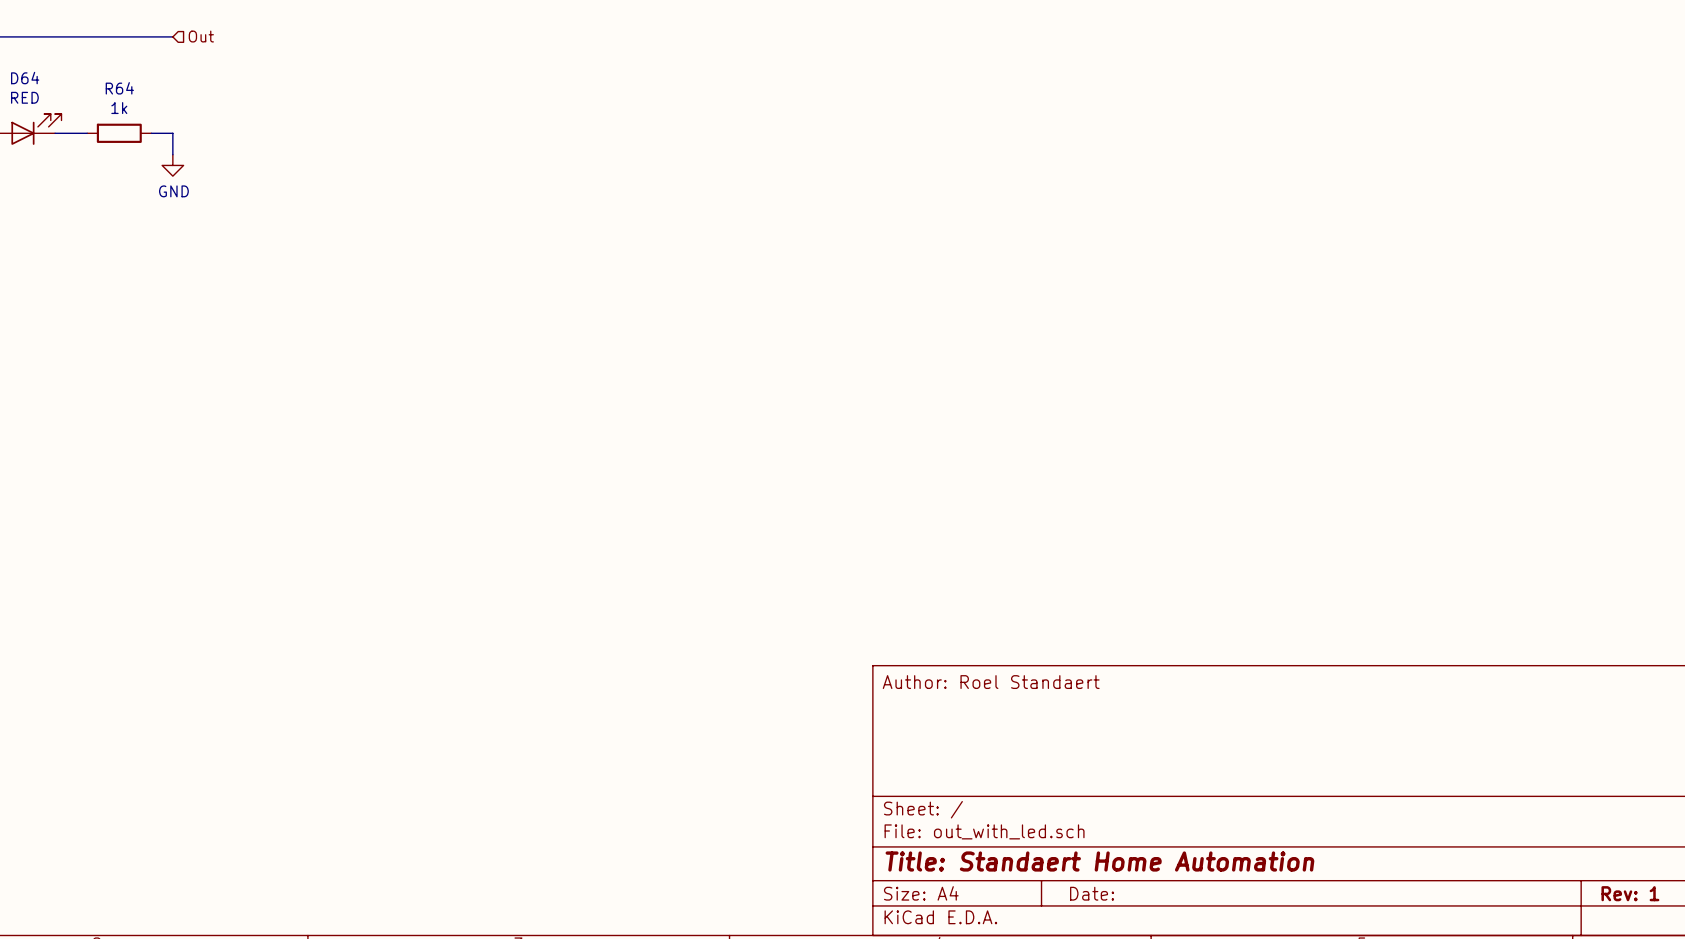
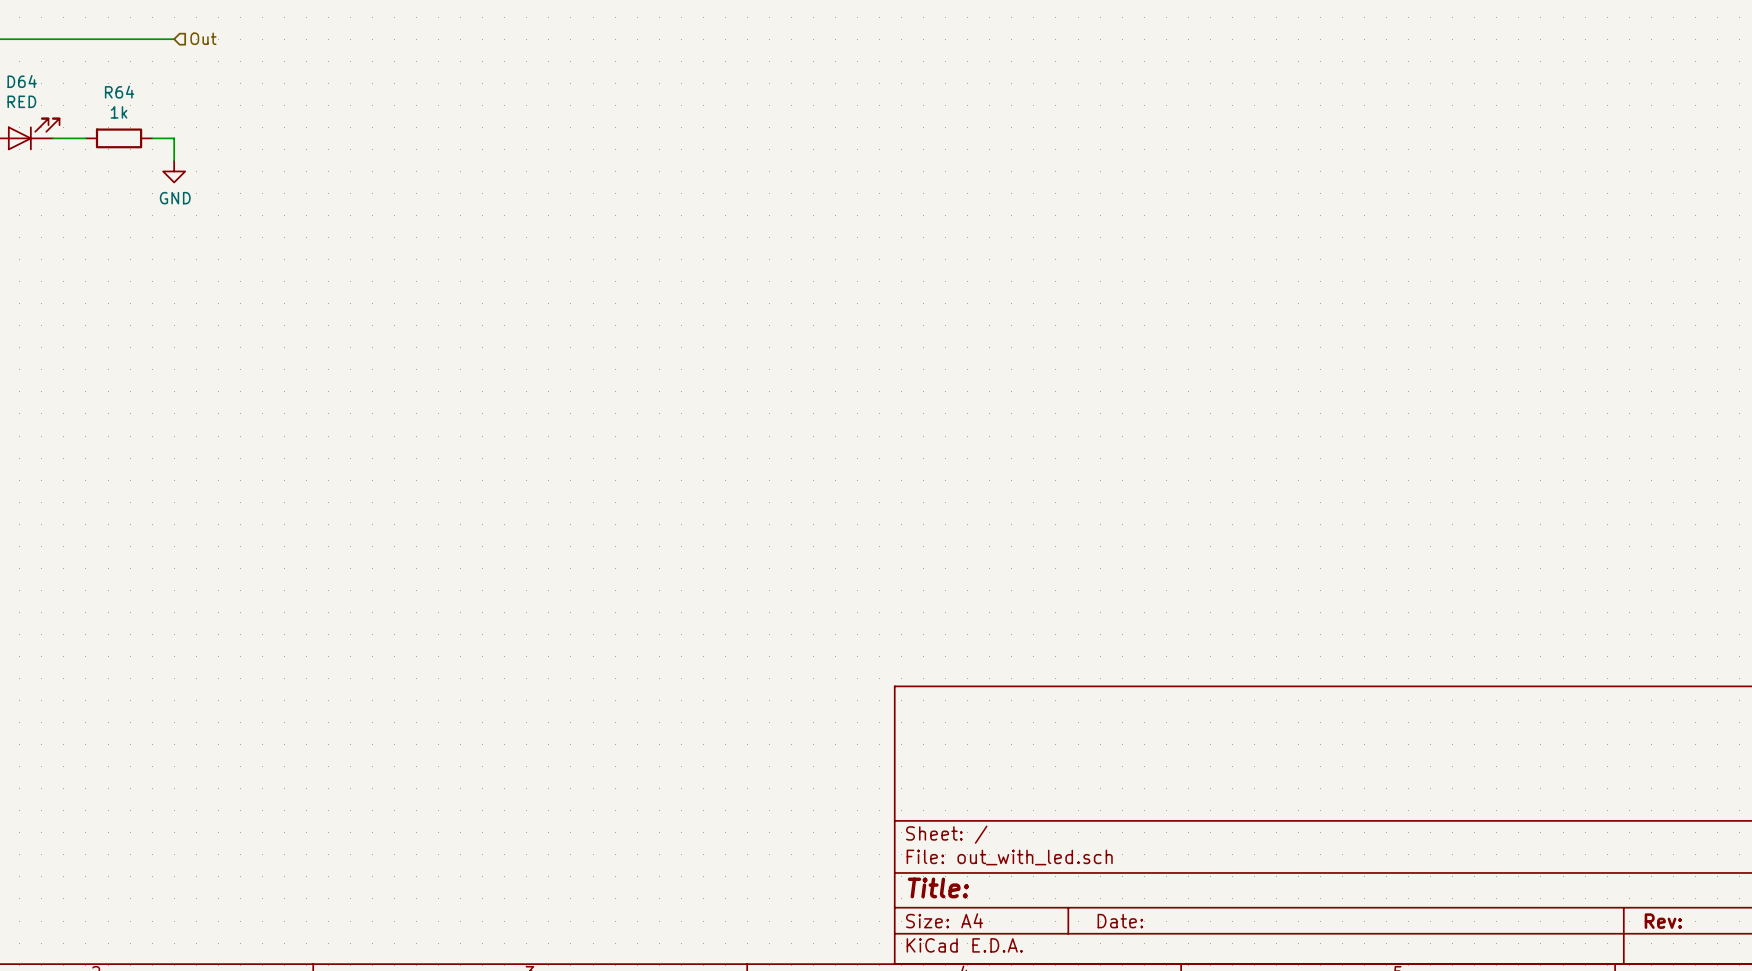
title block: Author: Roel Standaert (991, 682) -> none
title block: Title: Standaert Home Automation (1099, 861) -> Title: (938, 887)
title block: Rev: 1 (1630, 893) -> Rev: (1663, 921)

